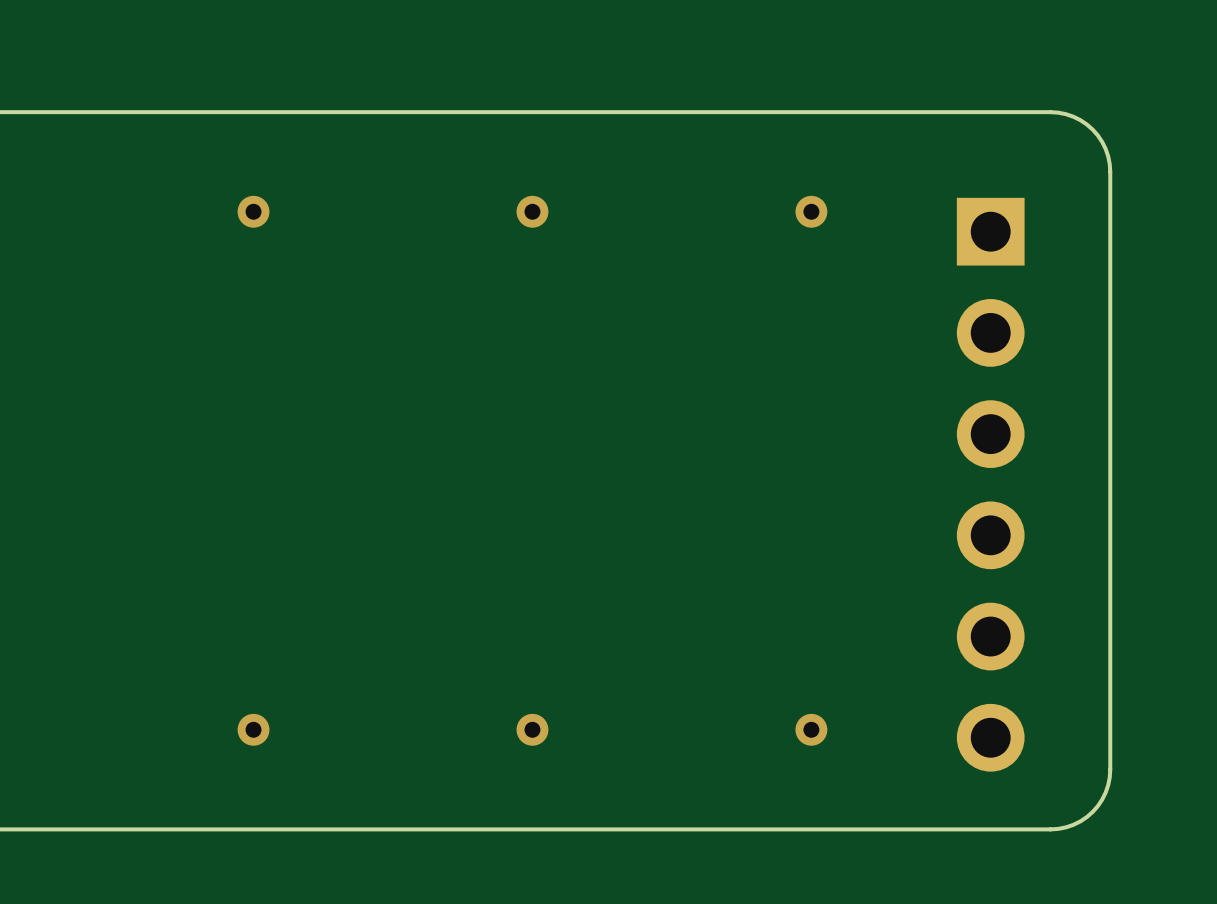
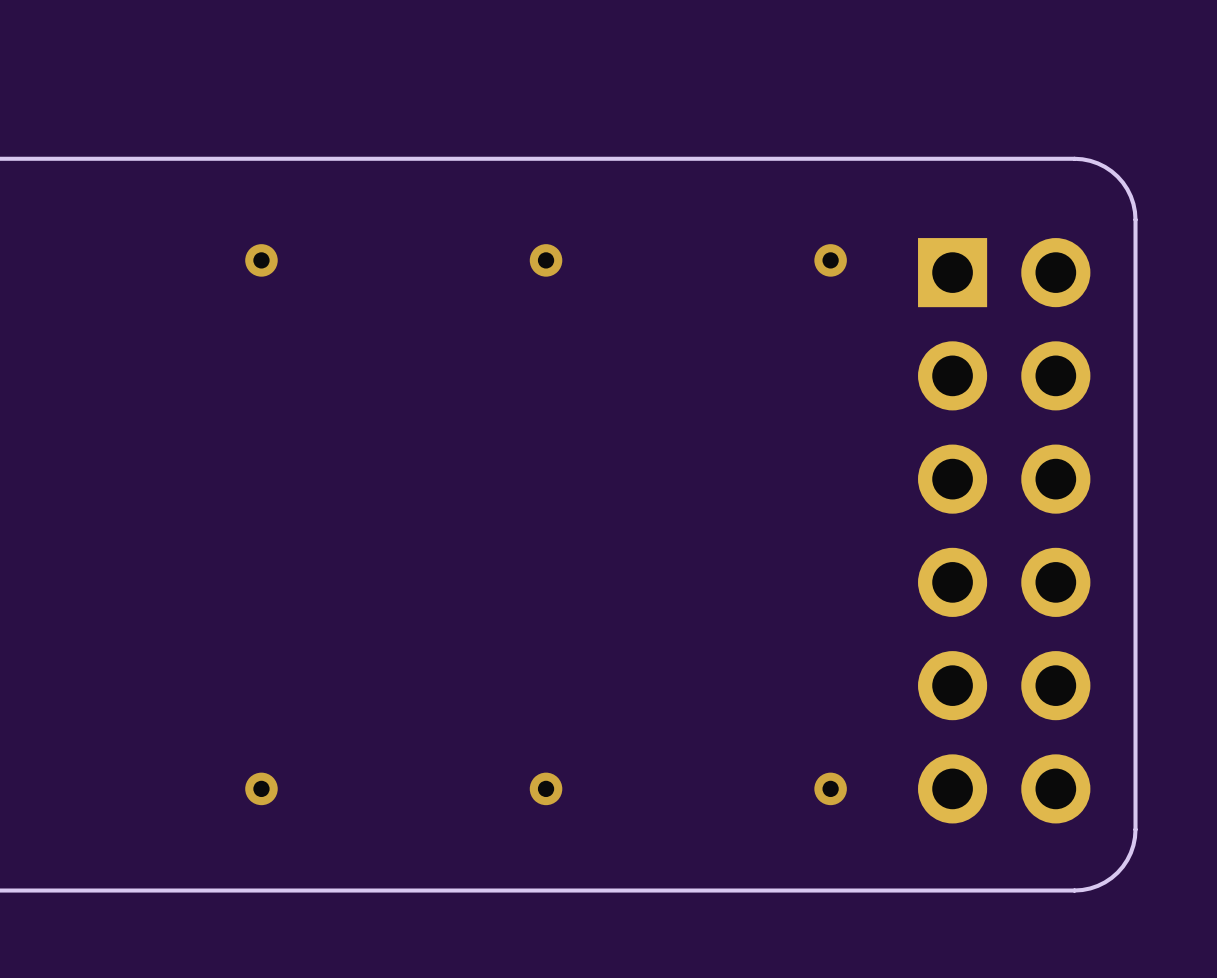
part footprint: [956, 197, 1025, 772] -> [918, 238, 1091, 824]

